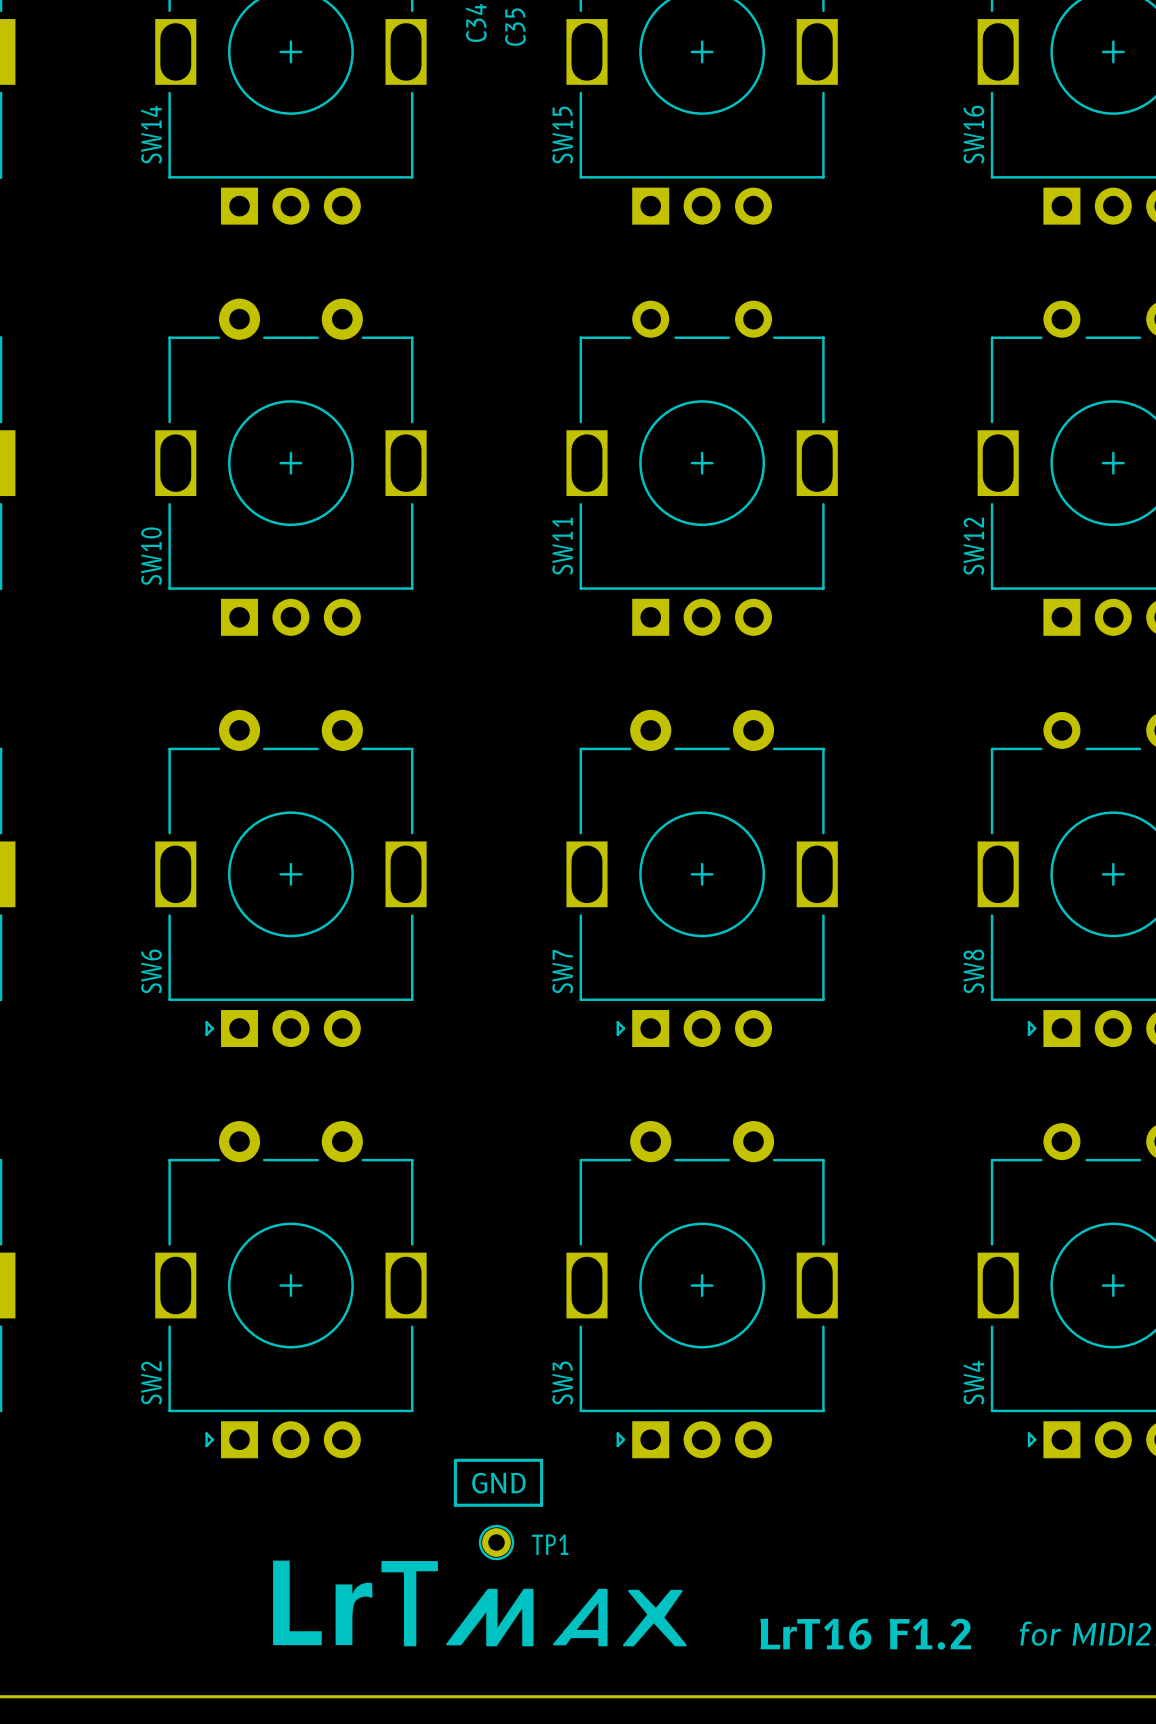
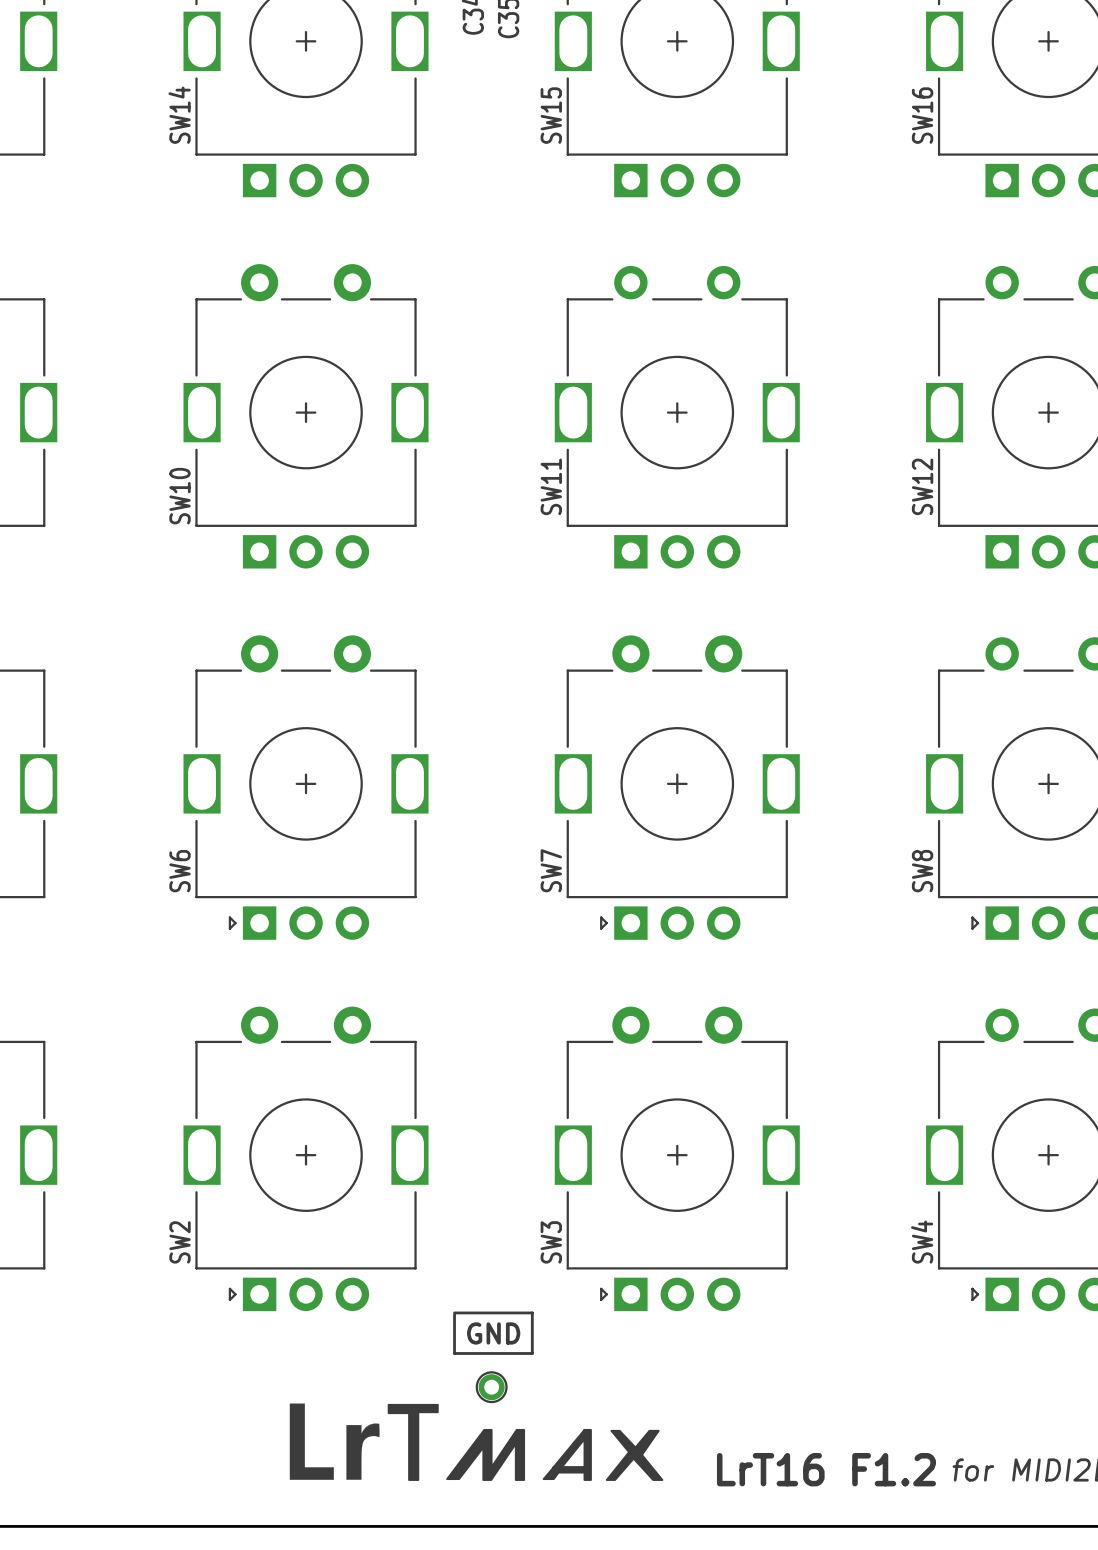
TP1 name: TP1 (550, 1544) -> none

